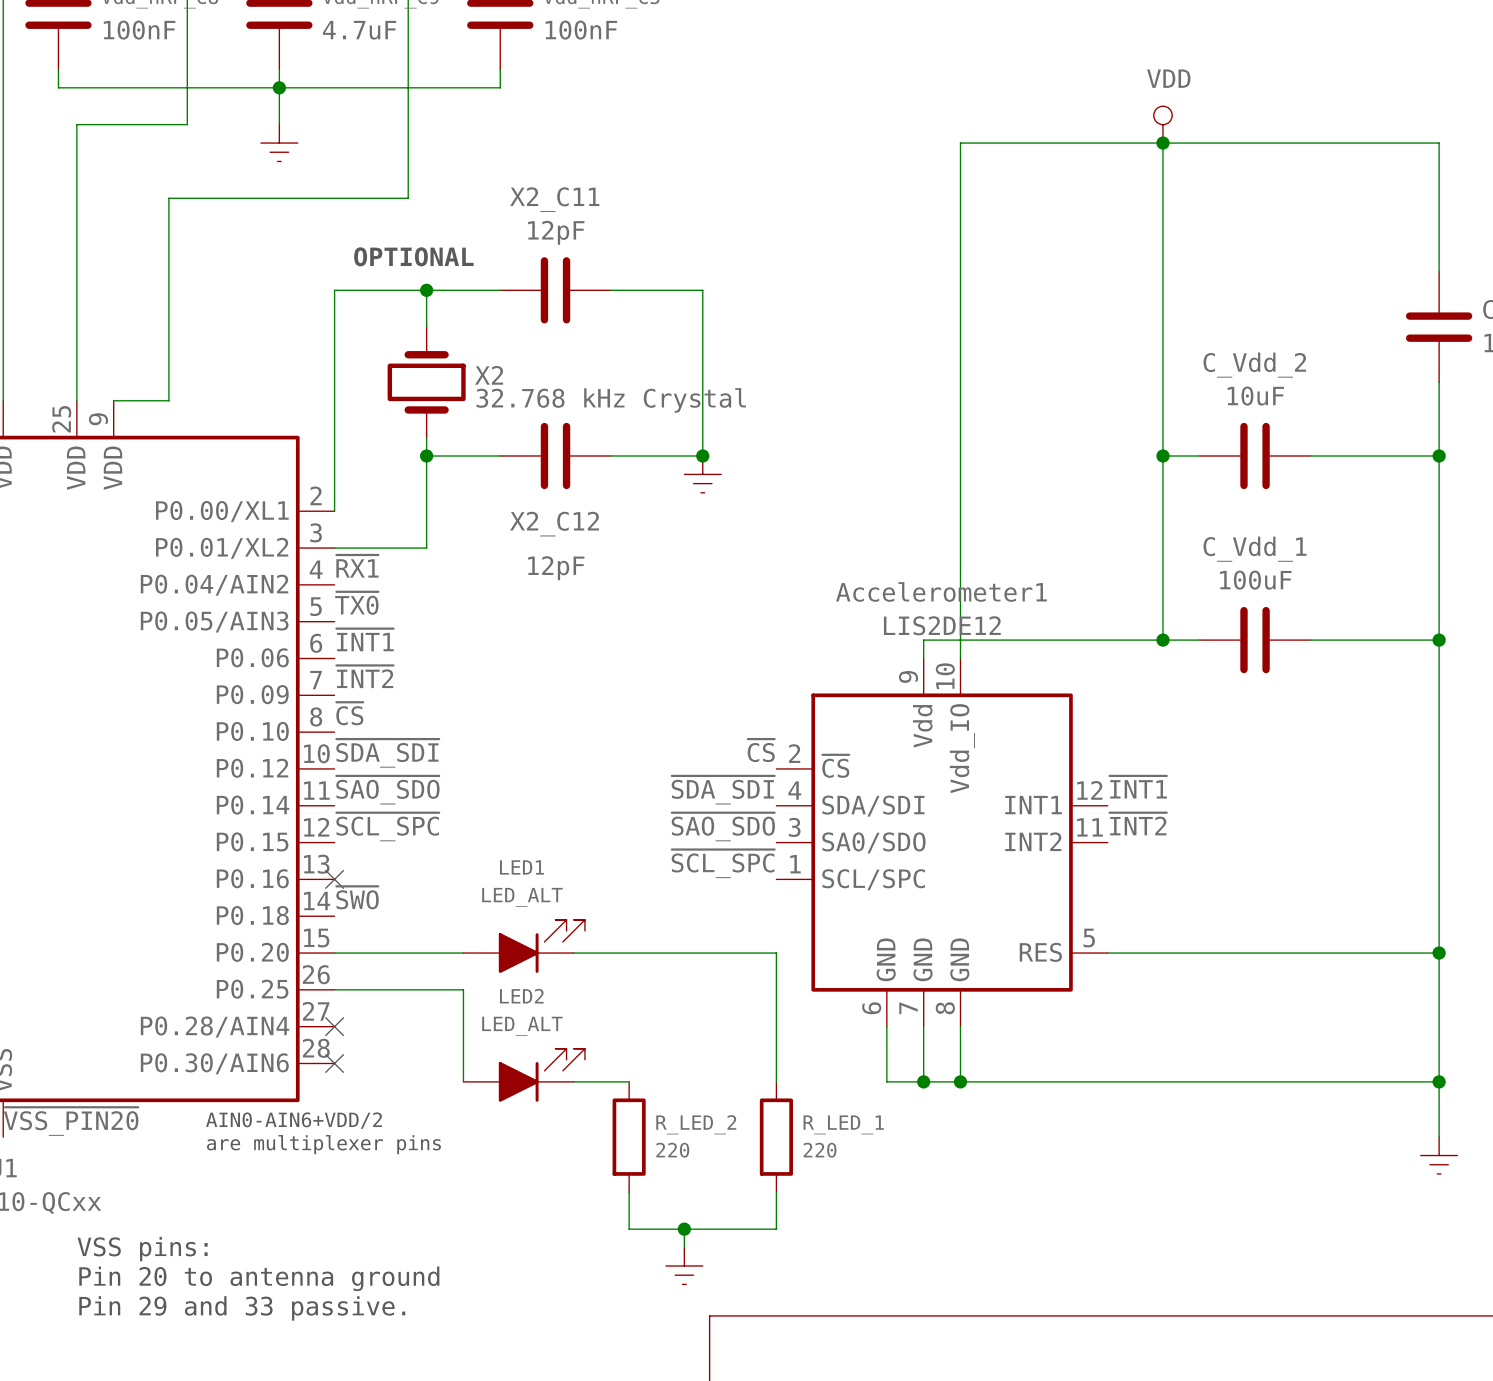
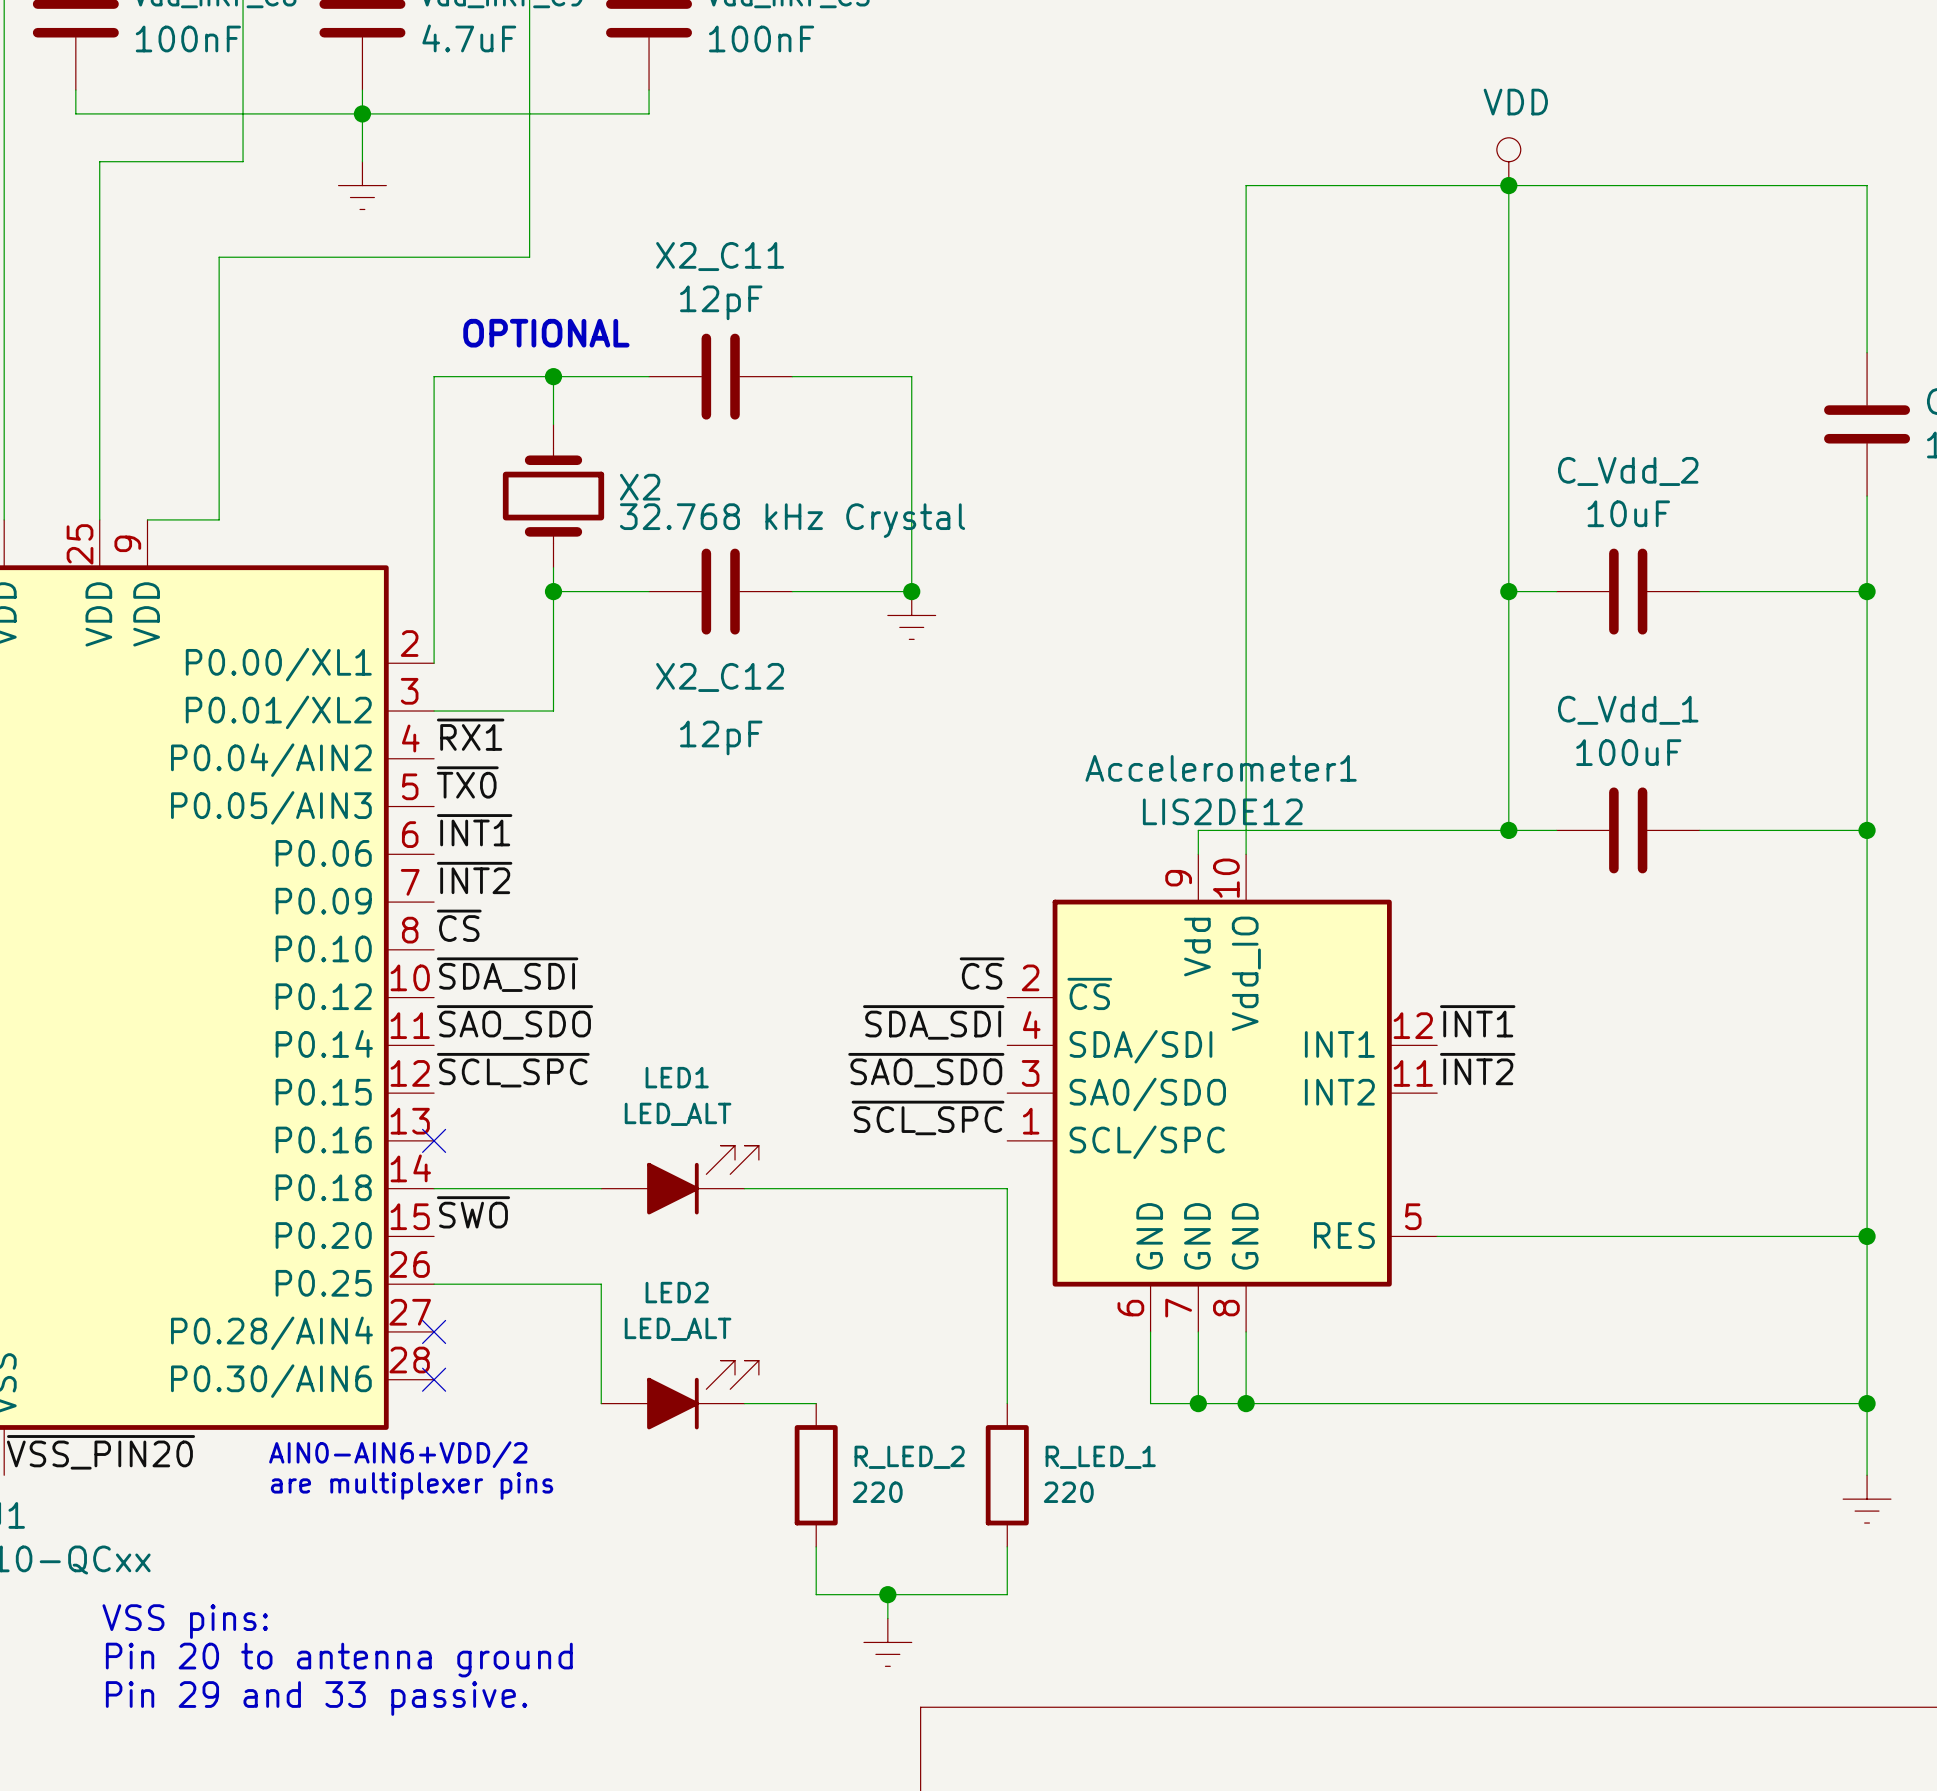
label position: ~{SWO} (357, 897) -> ~{SWO} (473, 1212)
LED1 position: (524, 946) -> (680, 1180)
wire: (334, 953) (463, 953) -> (434, 1188) (601, 1188)
wire: (573, 953) (776, 953) -> (744, 1188) (1007, 1188) (1007, 1236)

